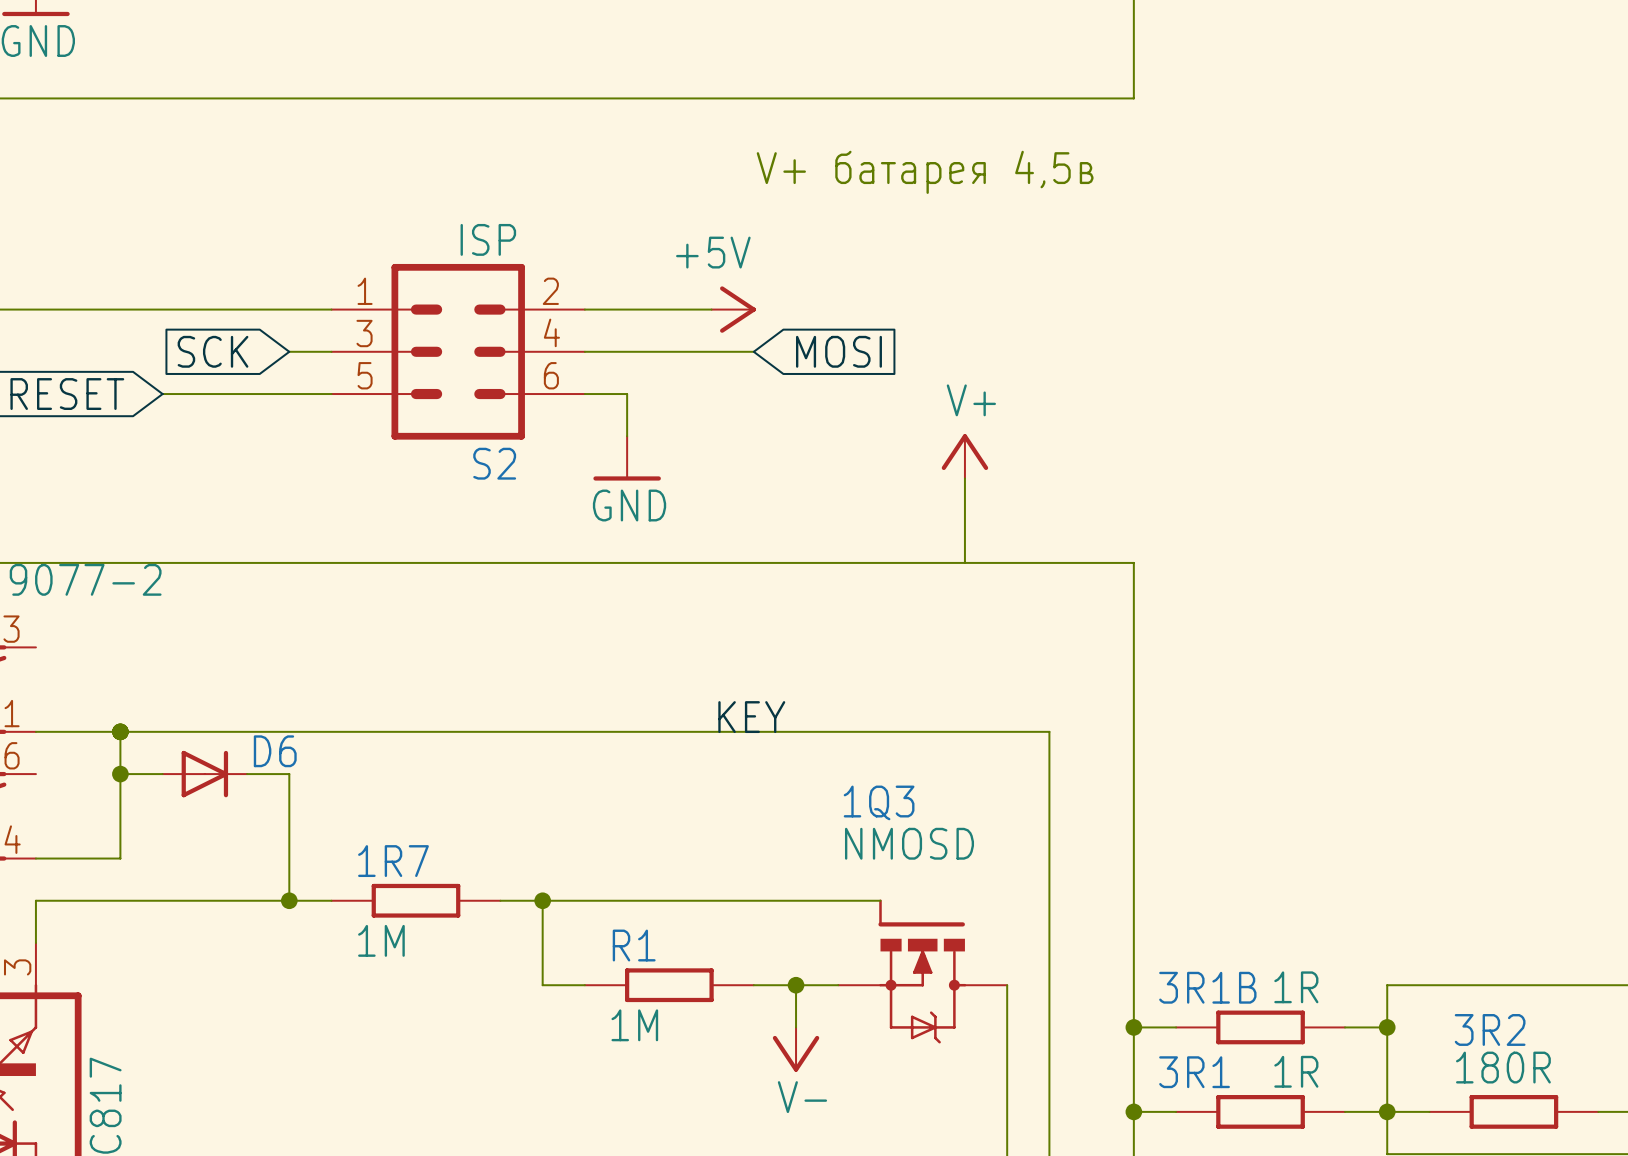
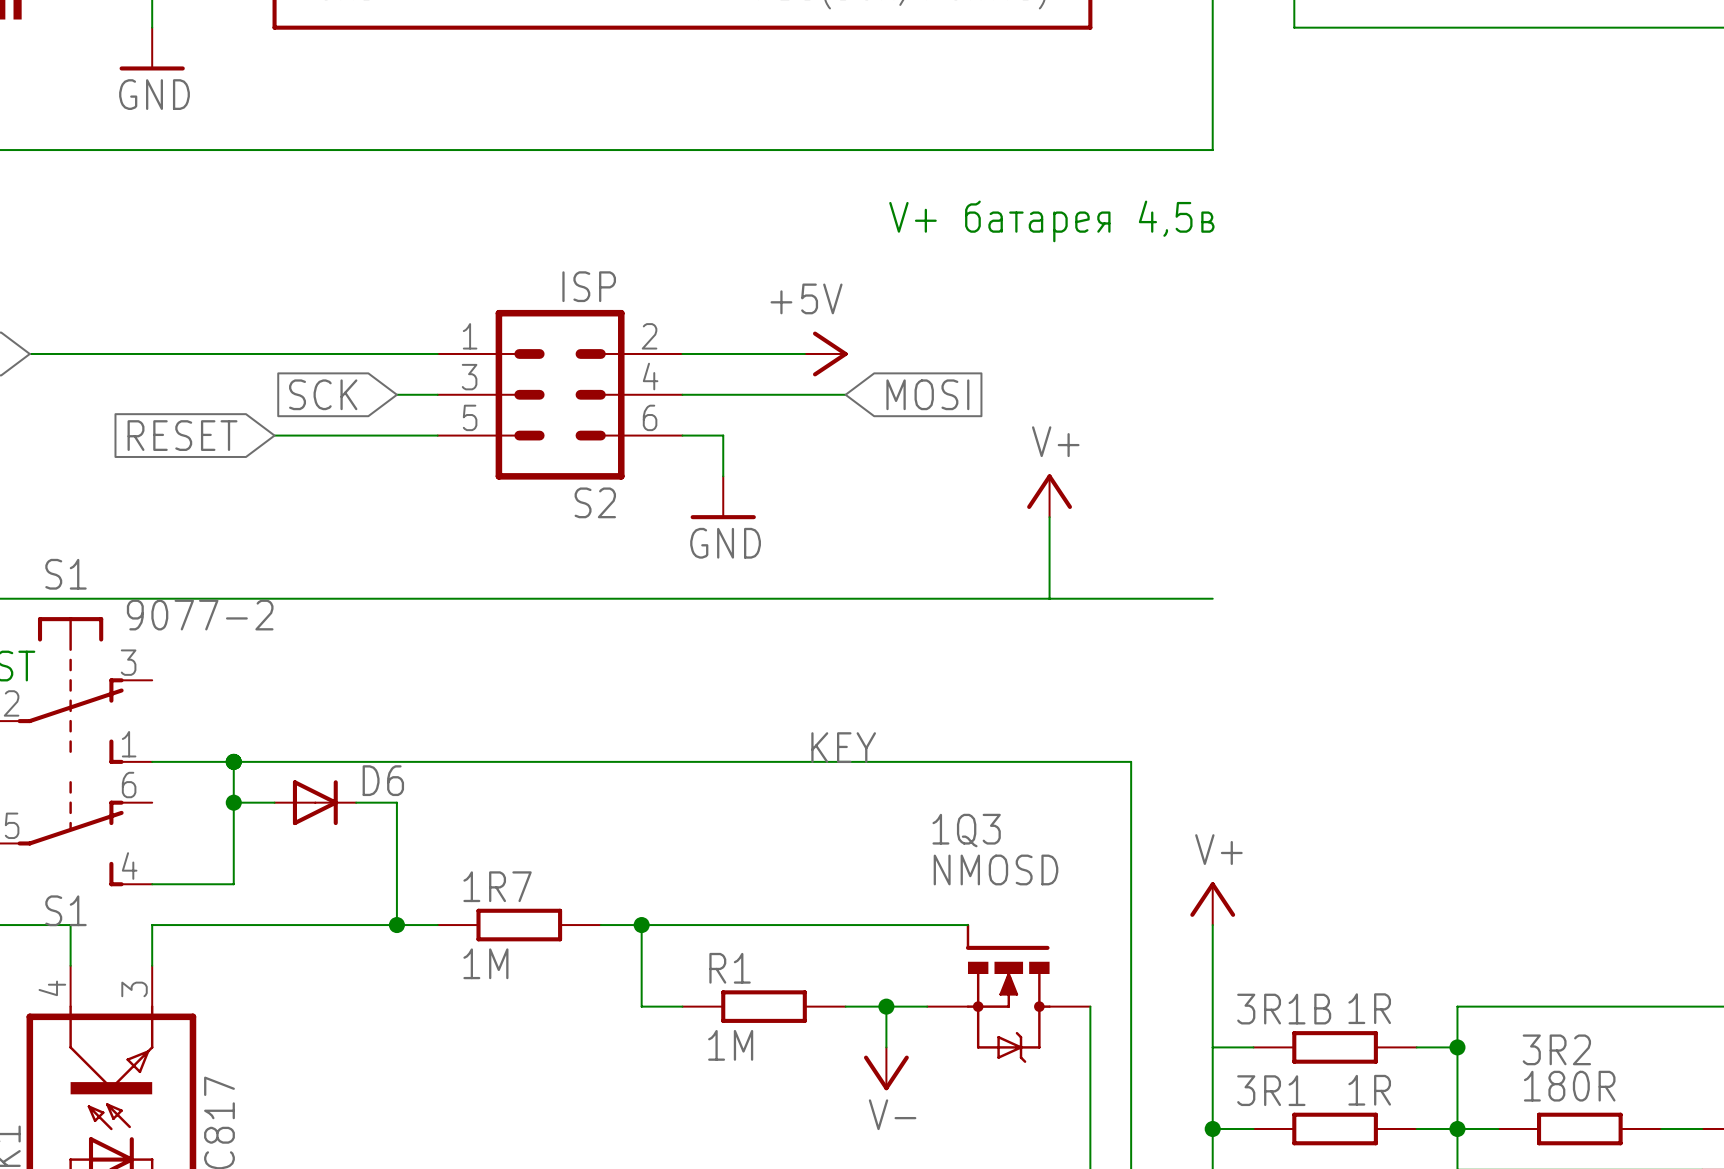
text position: V+ батарея 4,5в (925, 172) -> V+ батарея 4,5в (1051, 221)
wire: (1133, 562) (1133, 900) -> none
power symbol: none -> V+ (1212, 903)
junction: (1133, 1027) -> none

